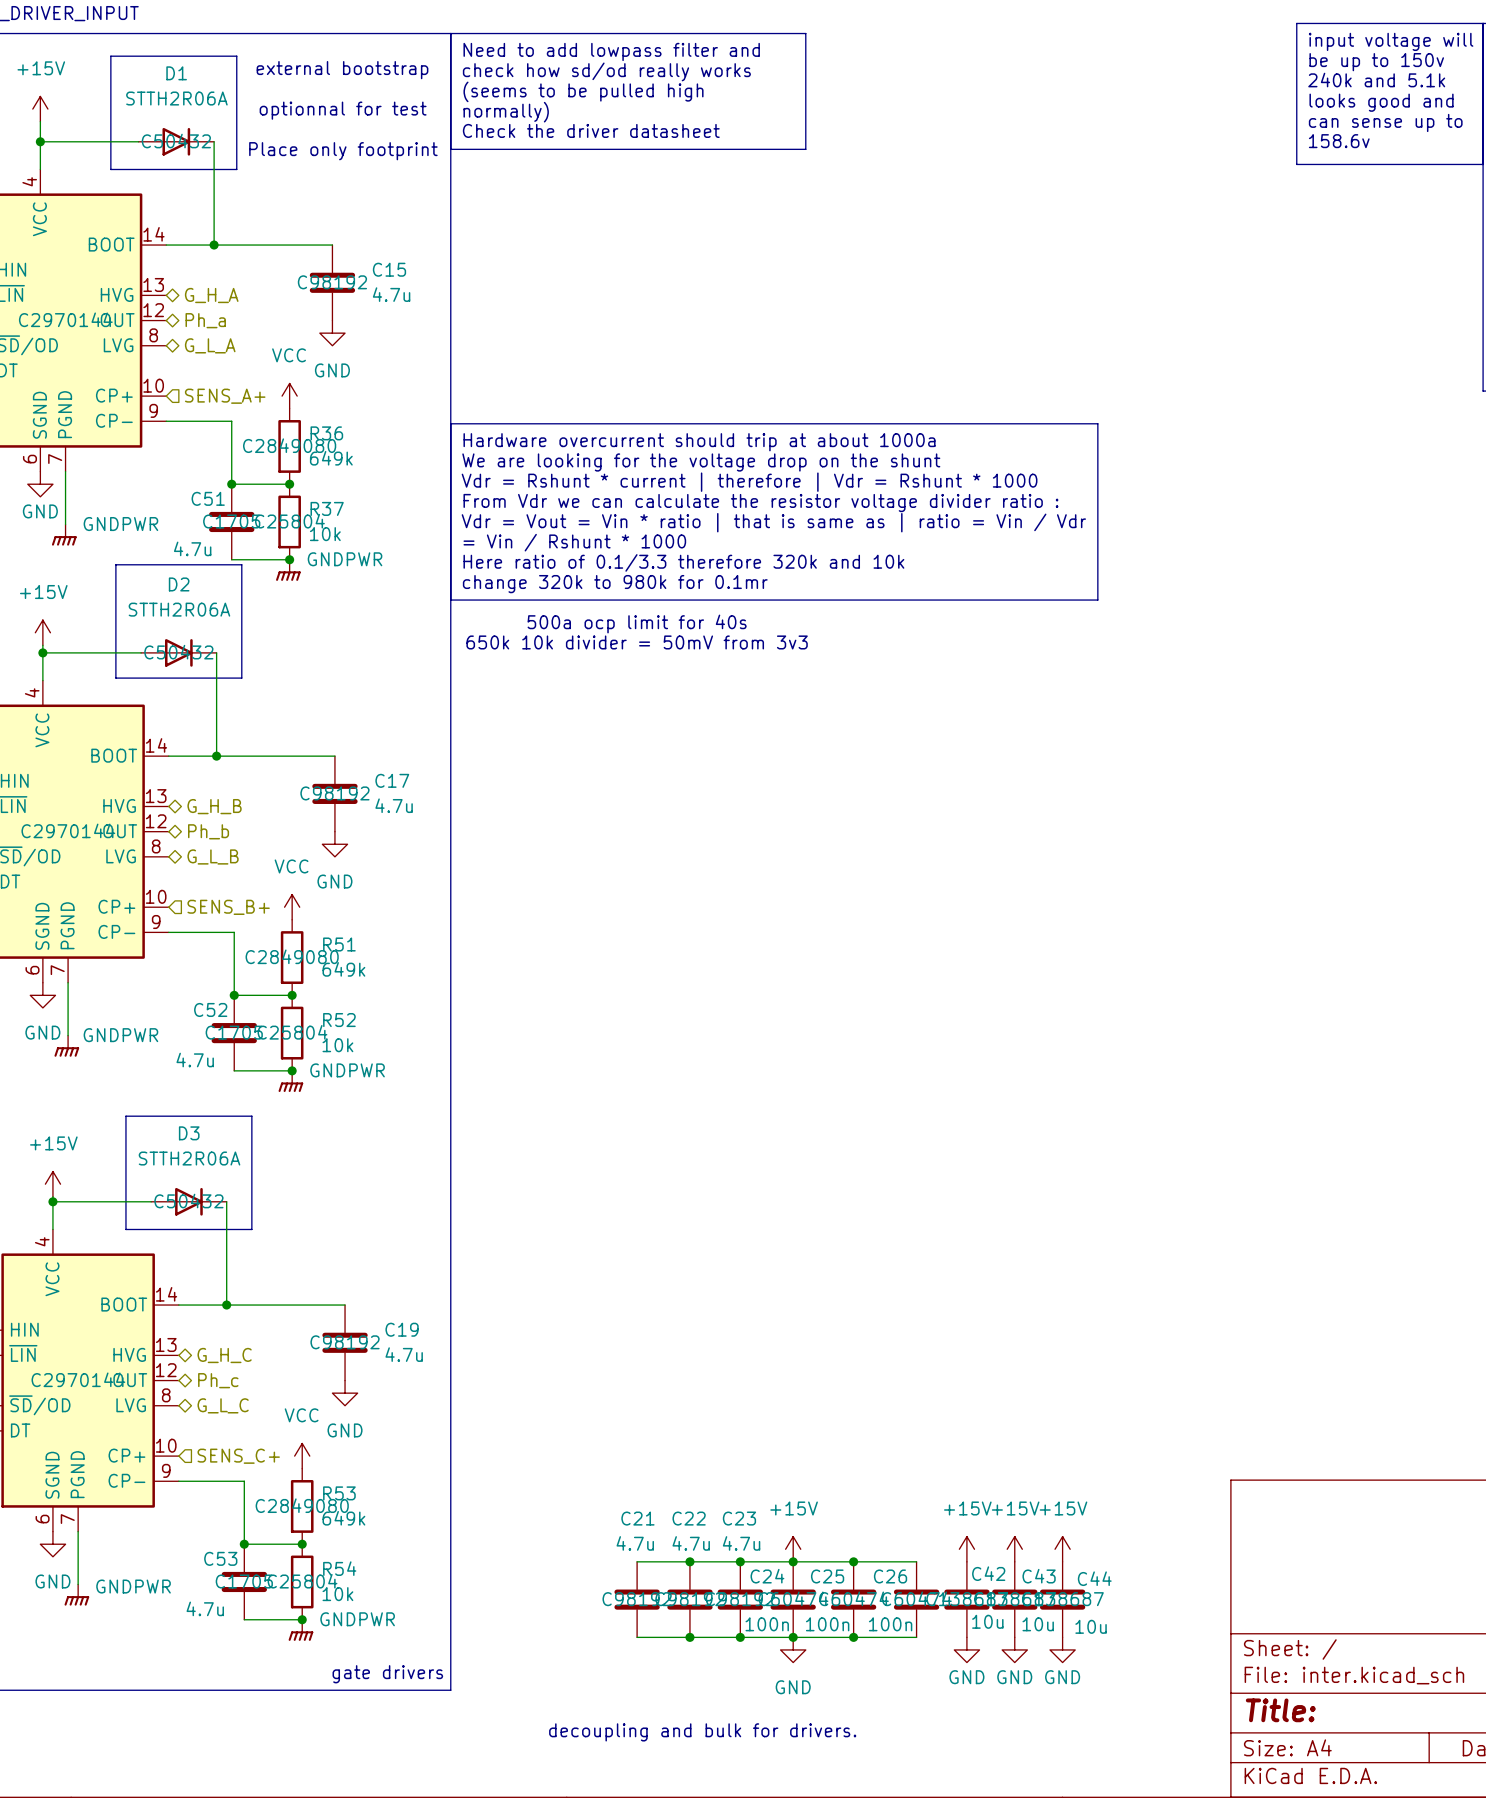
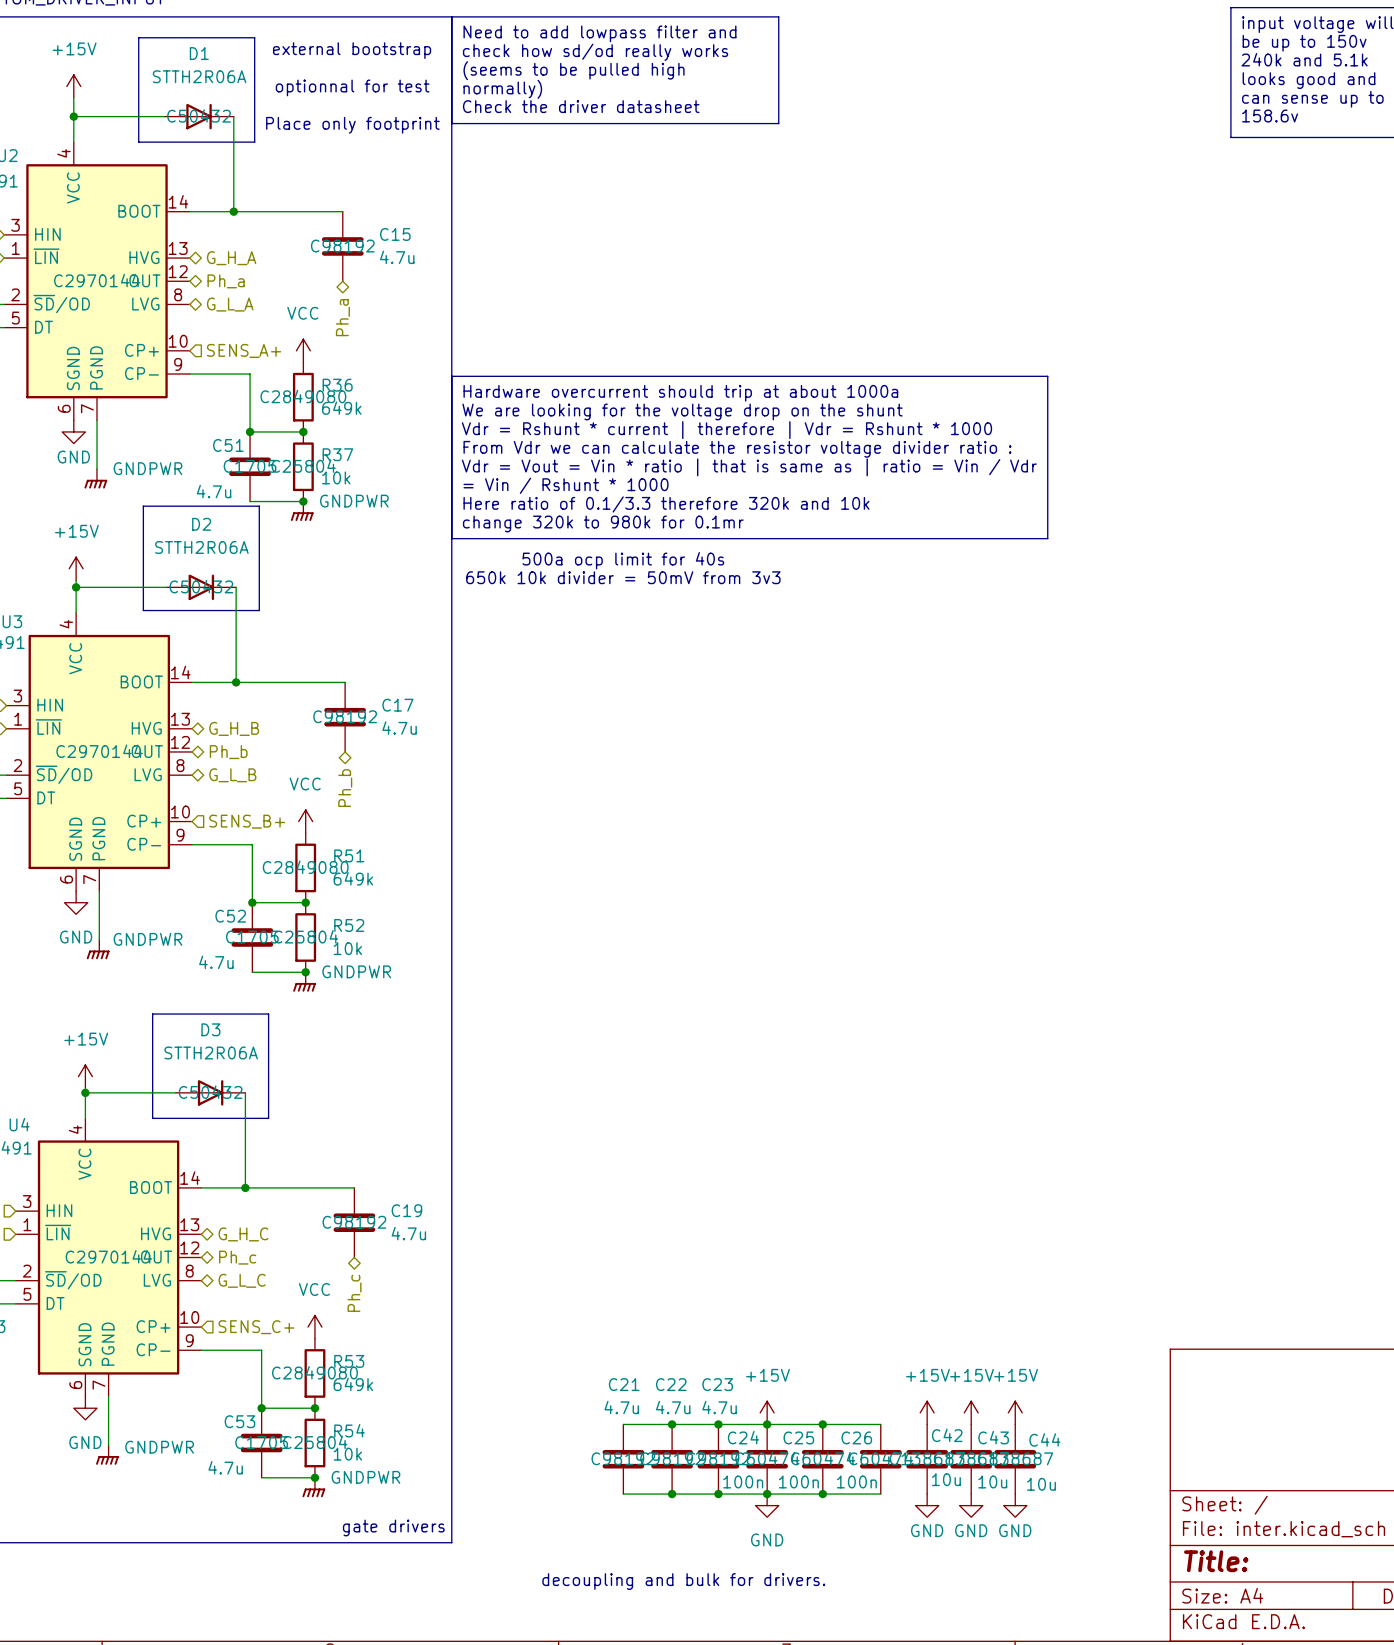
power symbol: GND (332, 333) -> none
hierarchical label: none -> Ph_a (342, 317)
power symbol: GND (334, 844) -> none
hierarchical label: none -> Ph_b (345, 788)
power symbol: GND (345, 1393) -> none
hierarchical label: none -> Ph_c (354, 1293)

